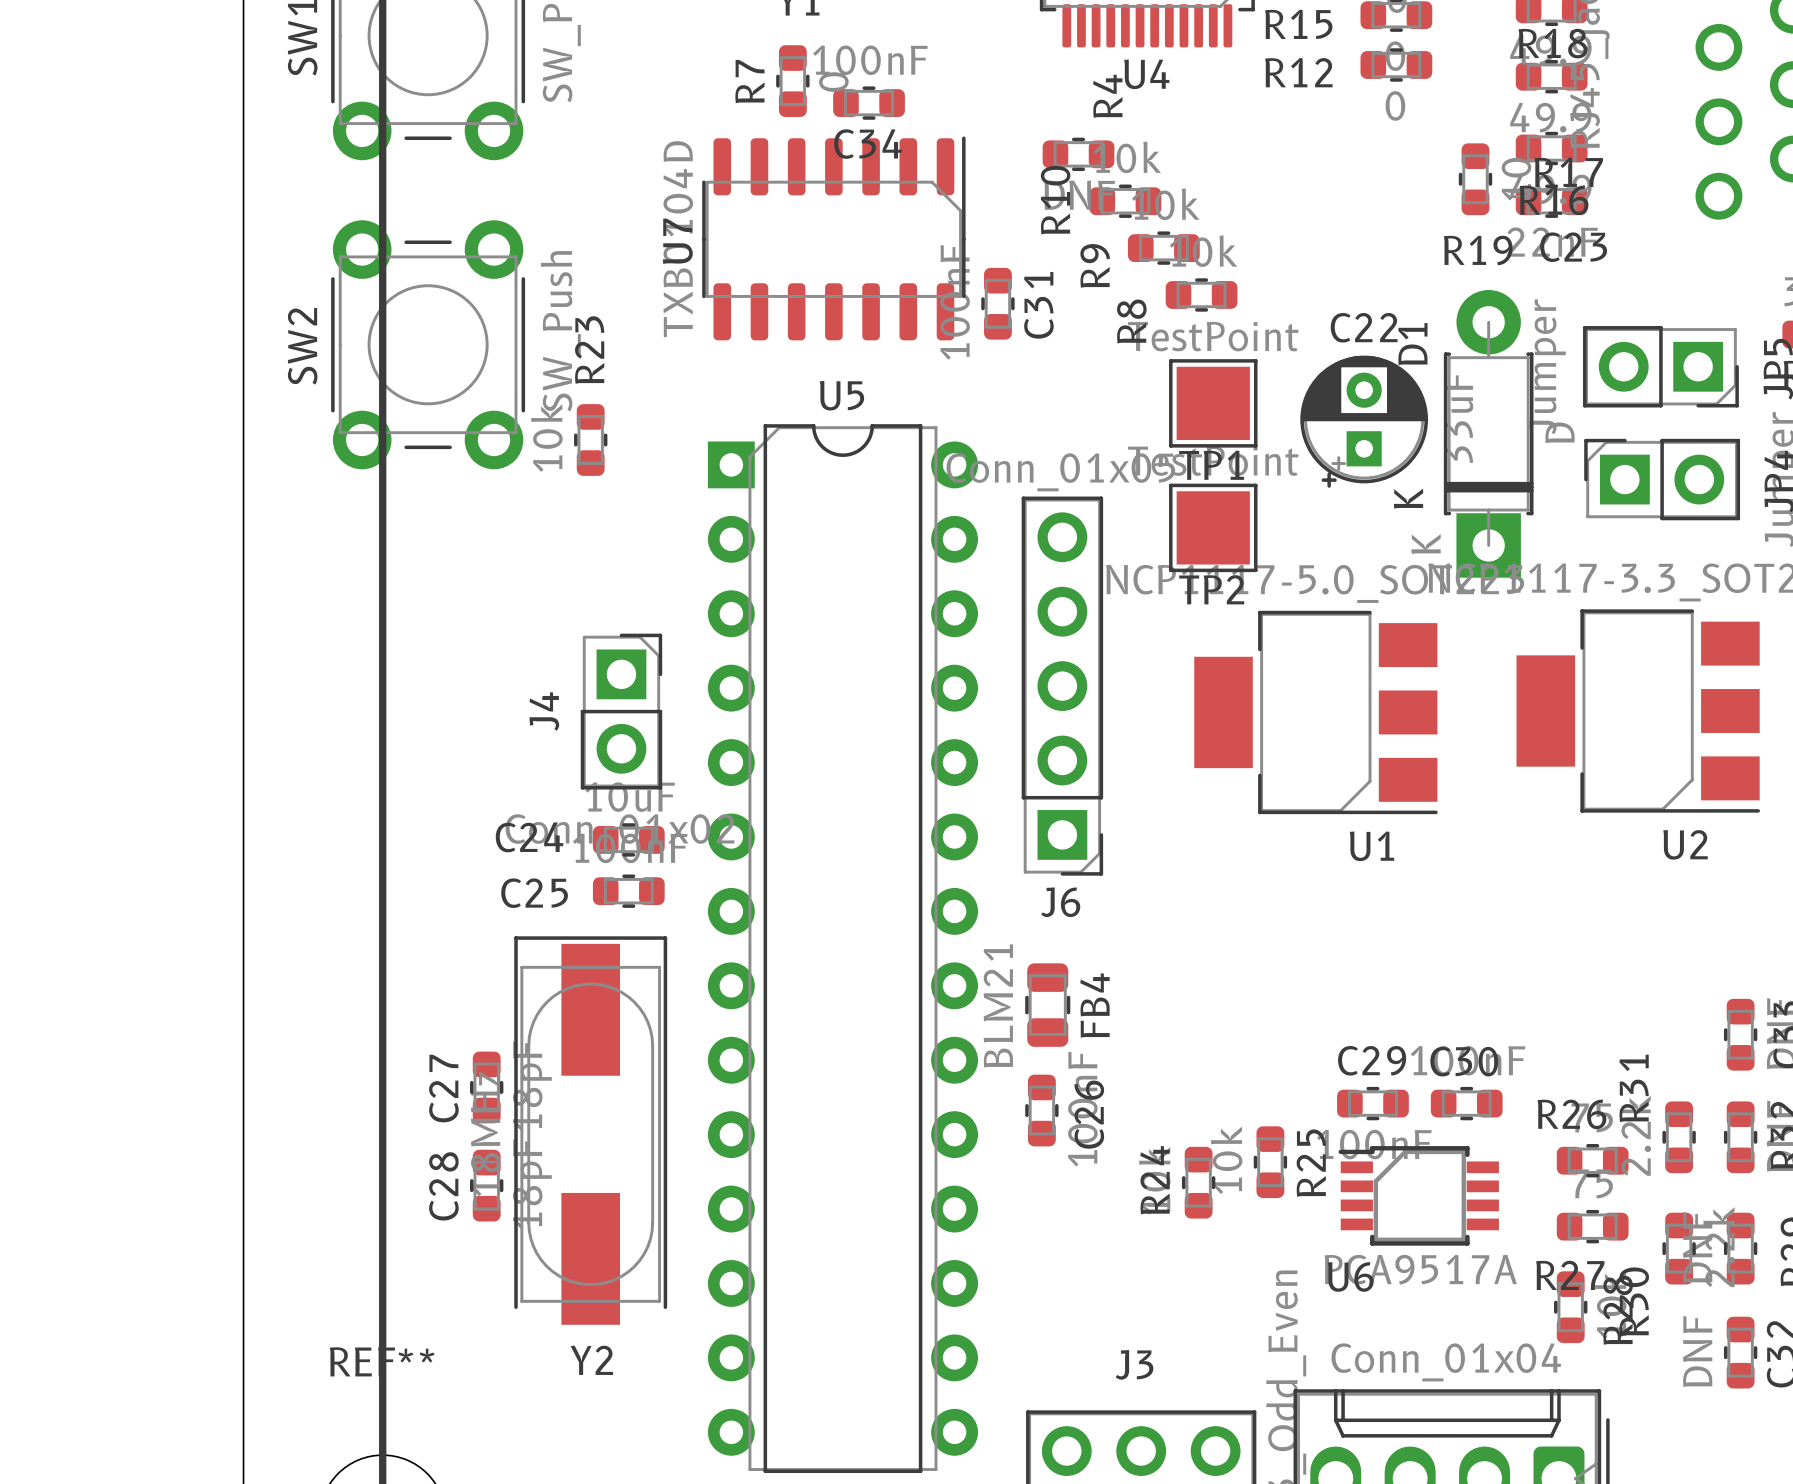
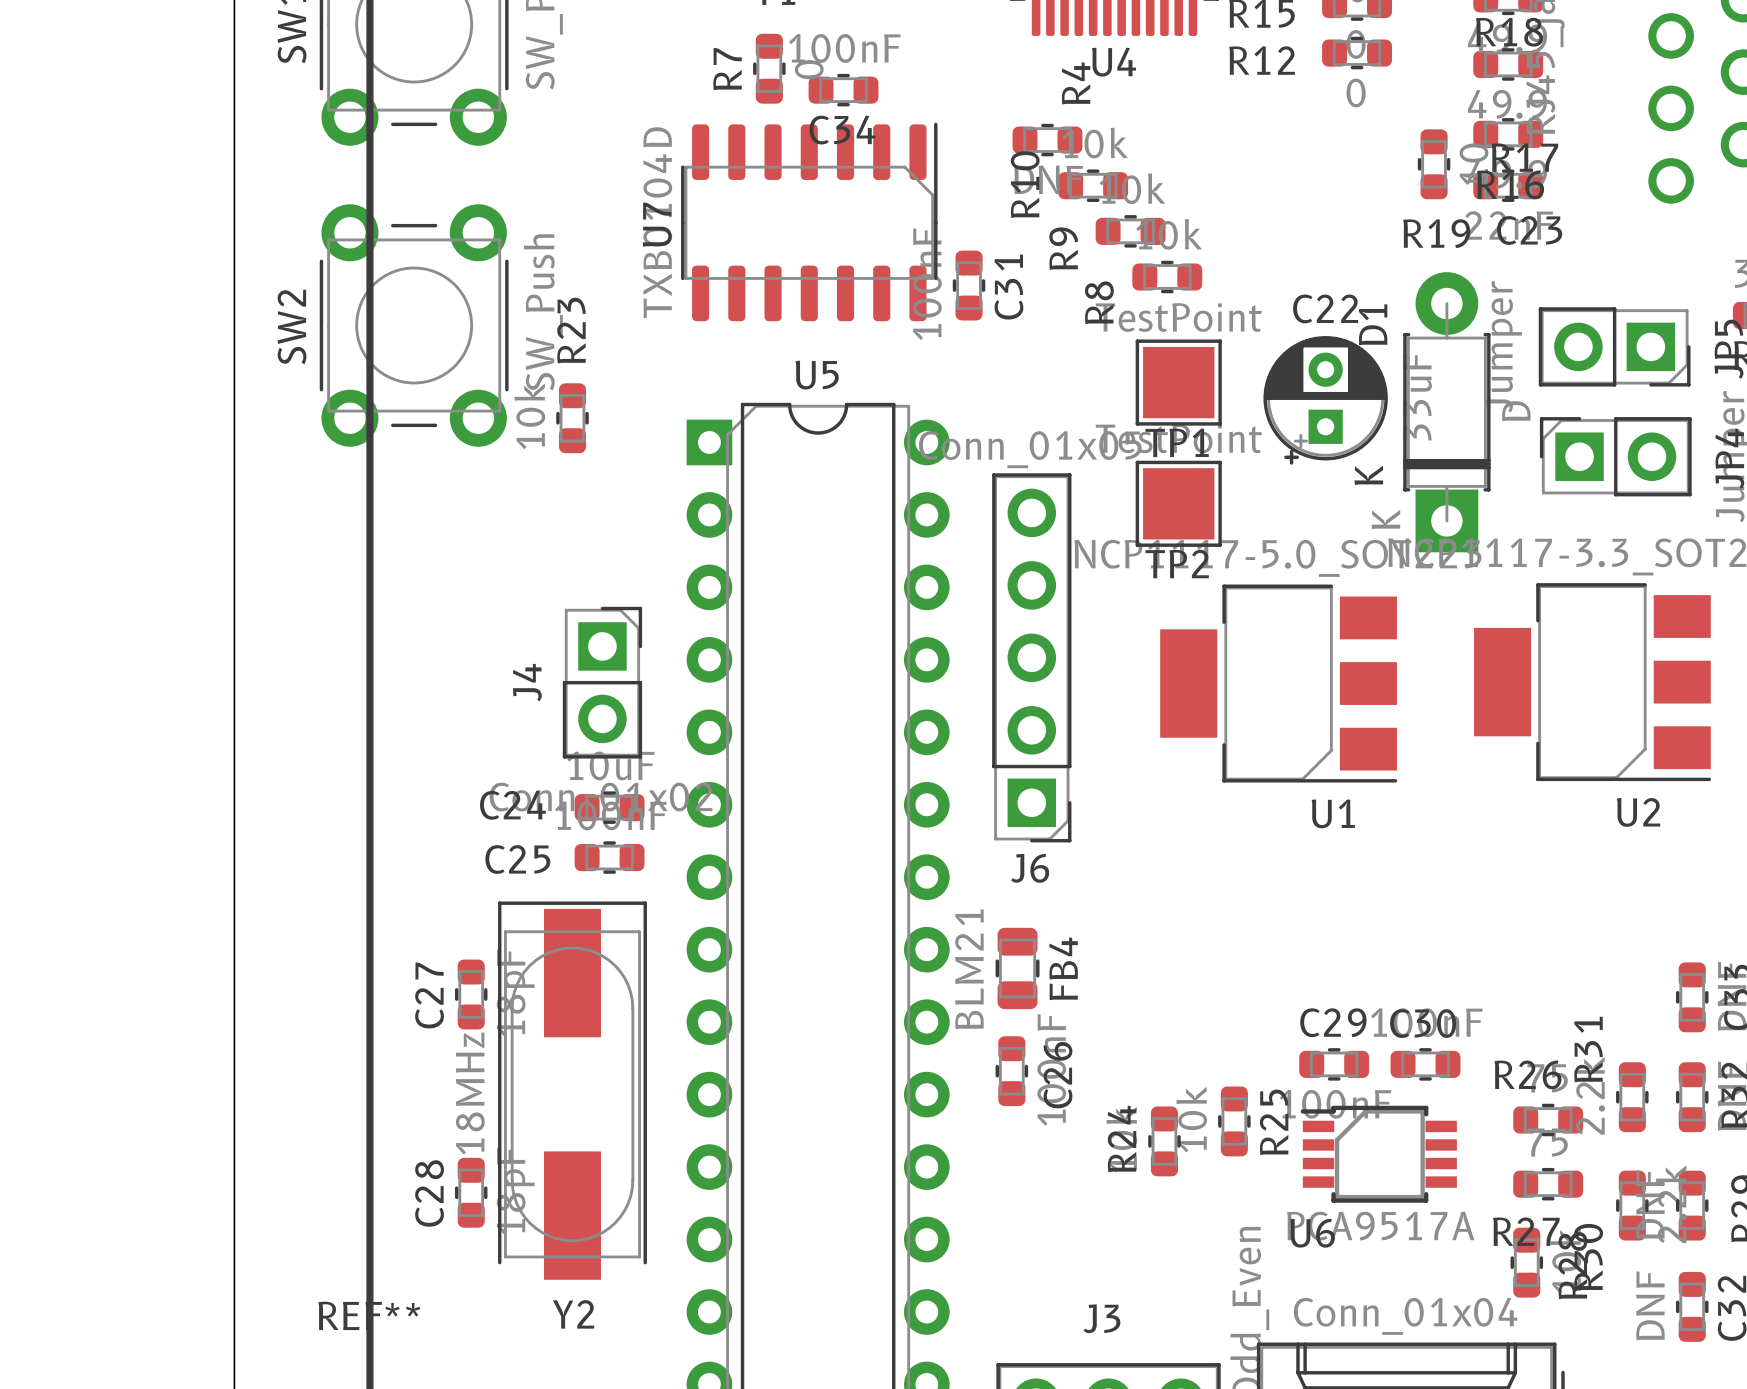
C27 position: (486, 1087) -> (471, 994)
C28 position: (486, 1185) -> (471, 1192)

